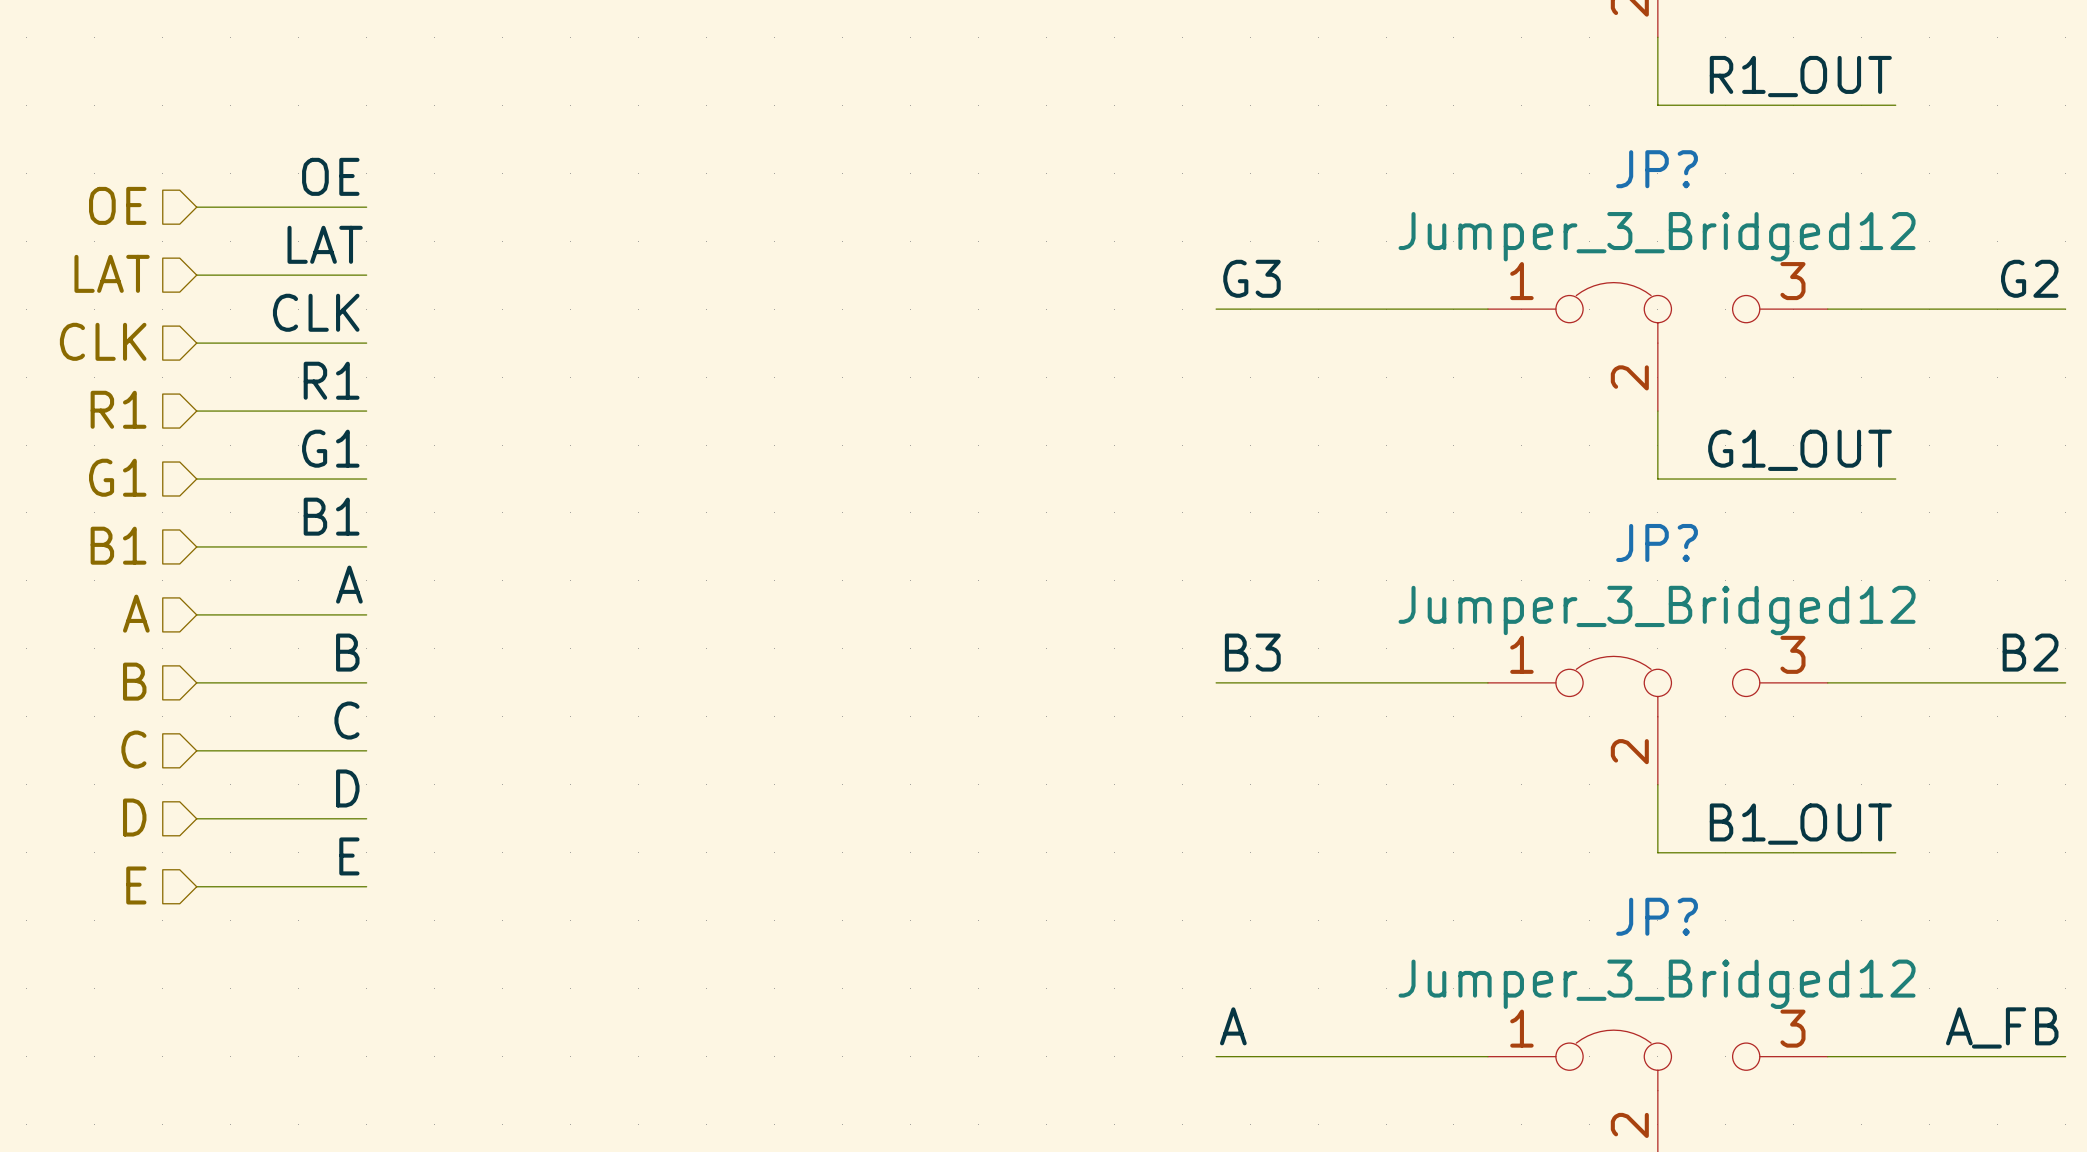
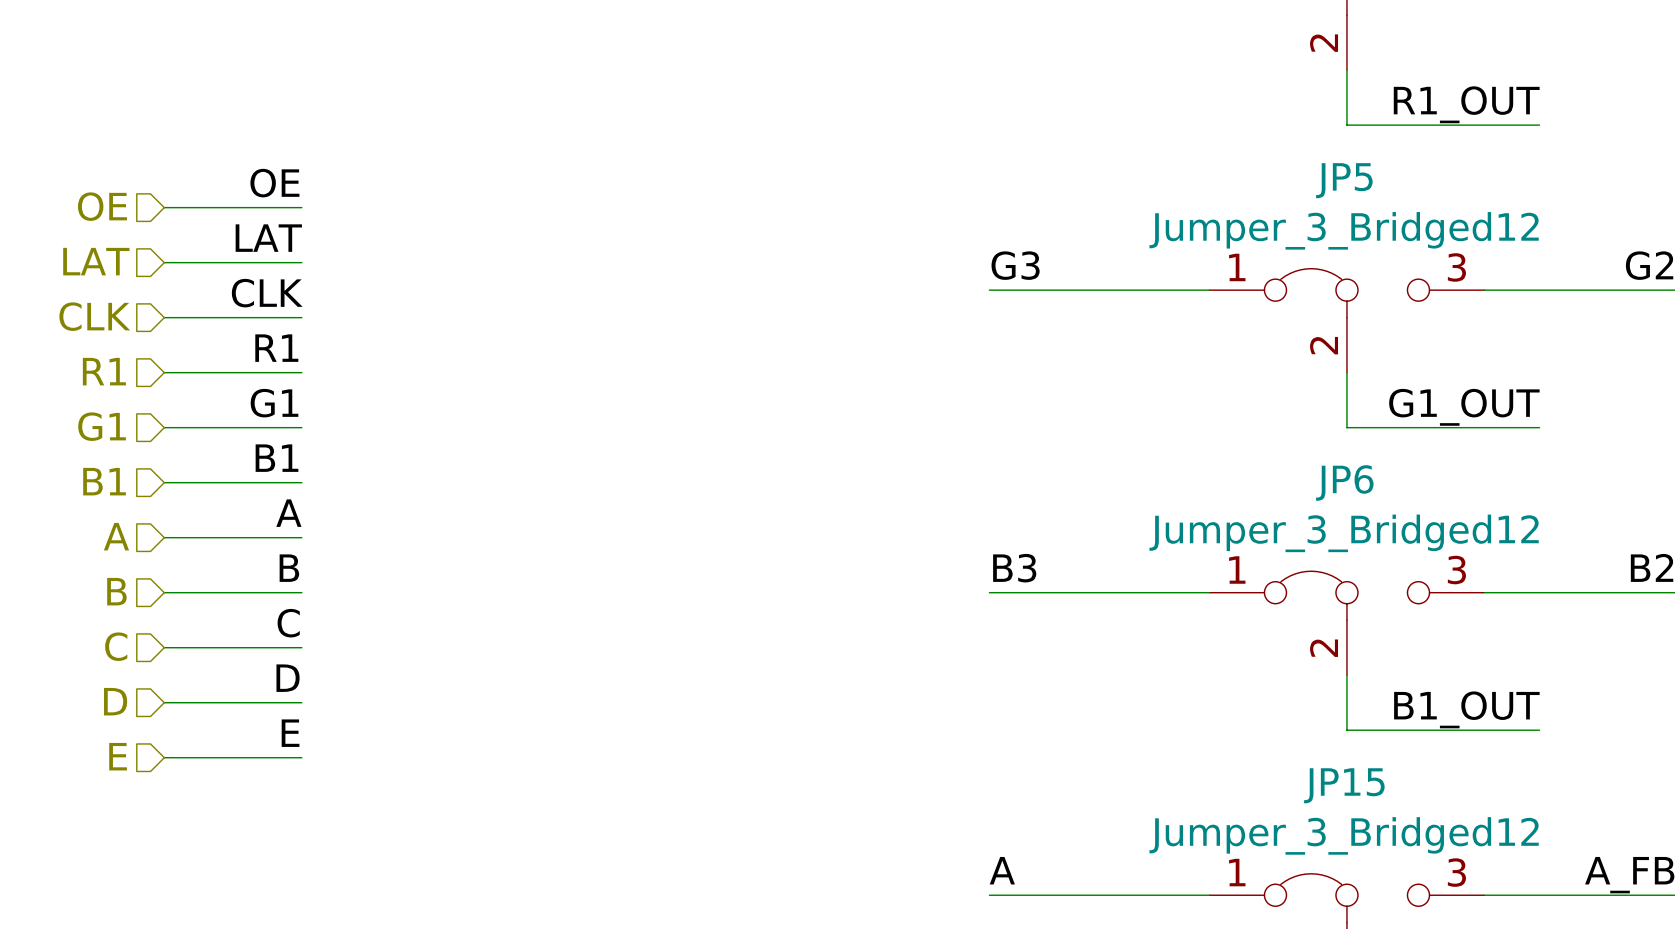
JP? name: JP? (1657, 169) -> JP5 (1344, 180)
JP? name: JP? (1657, 542) -> JP6 (1344, 482)
JP? name: JP? (1657, 916) -> JP15 (1344, 785)

